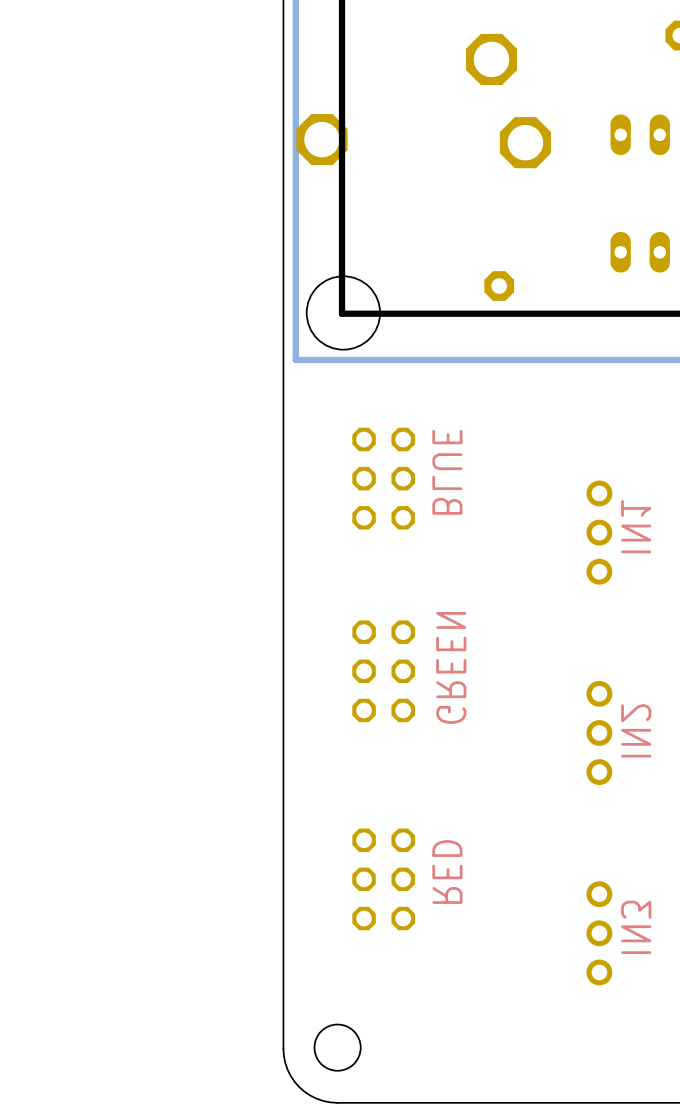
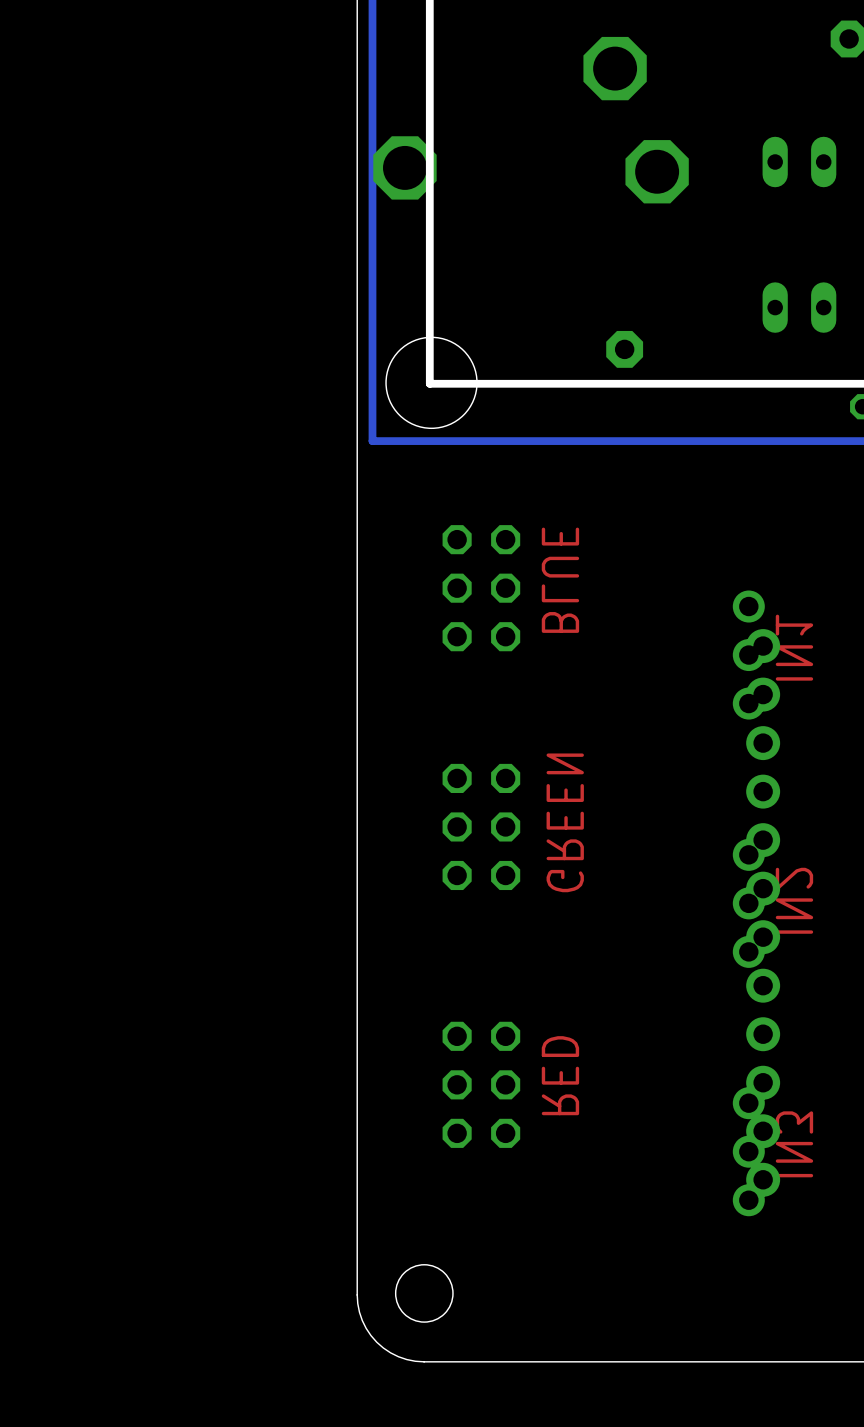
part: none -> (763, 912)

